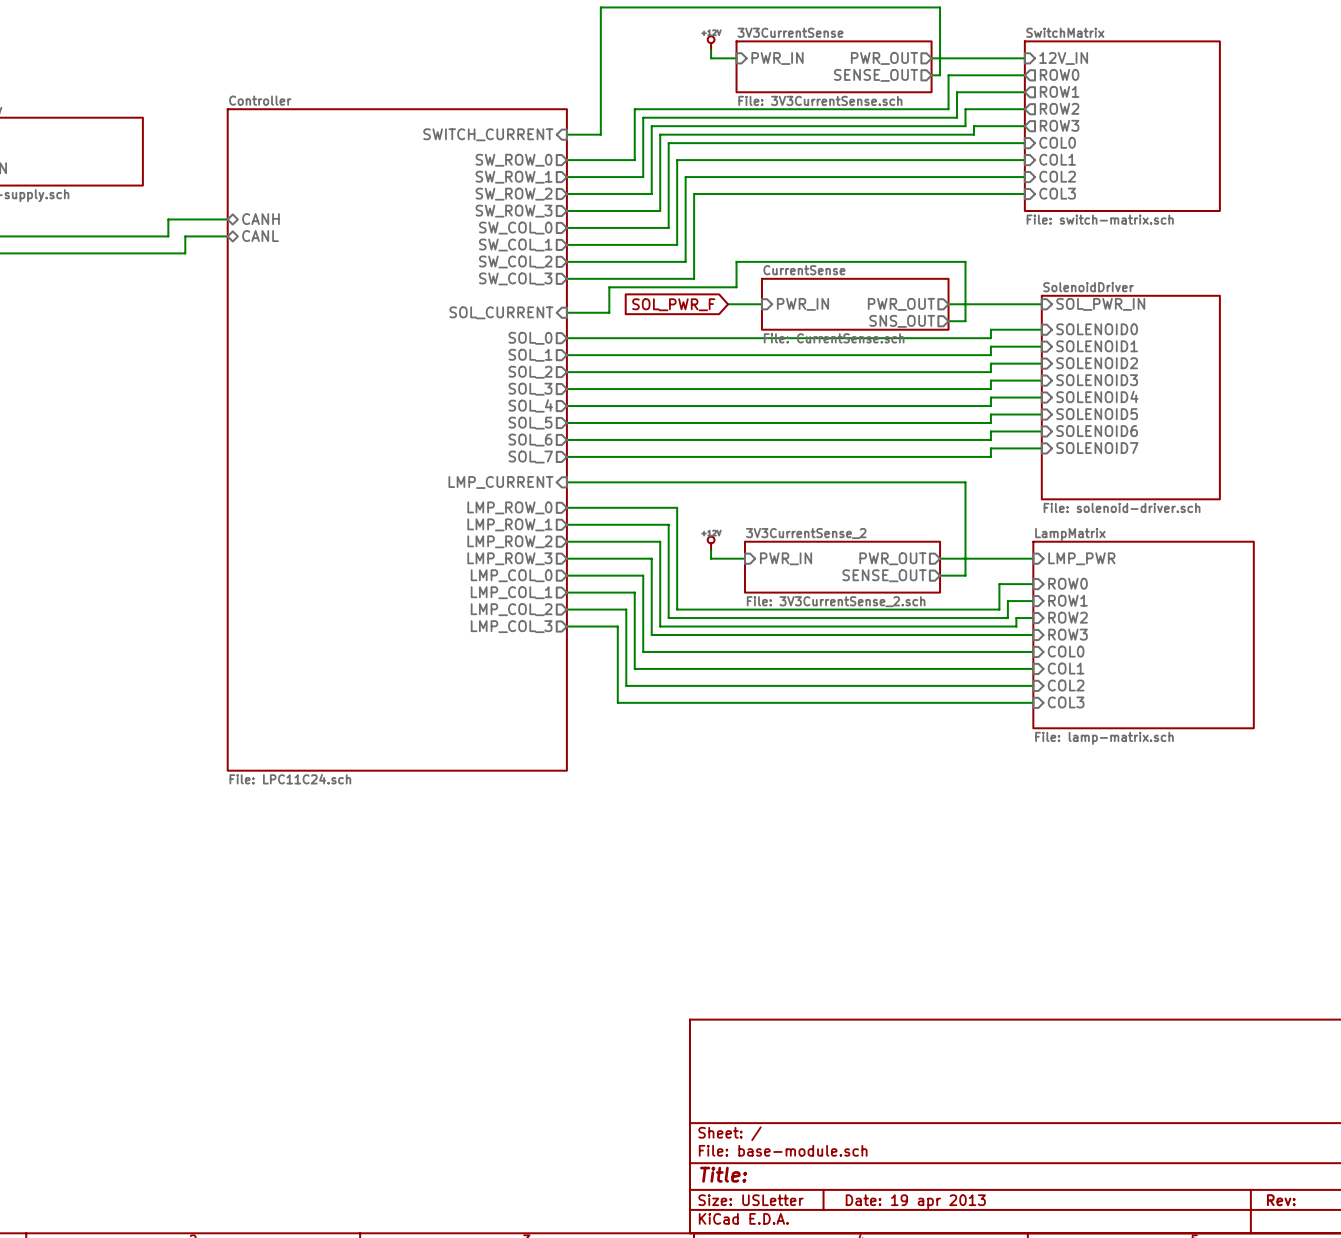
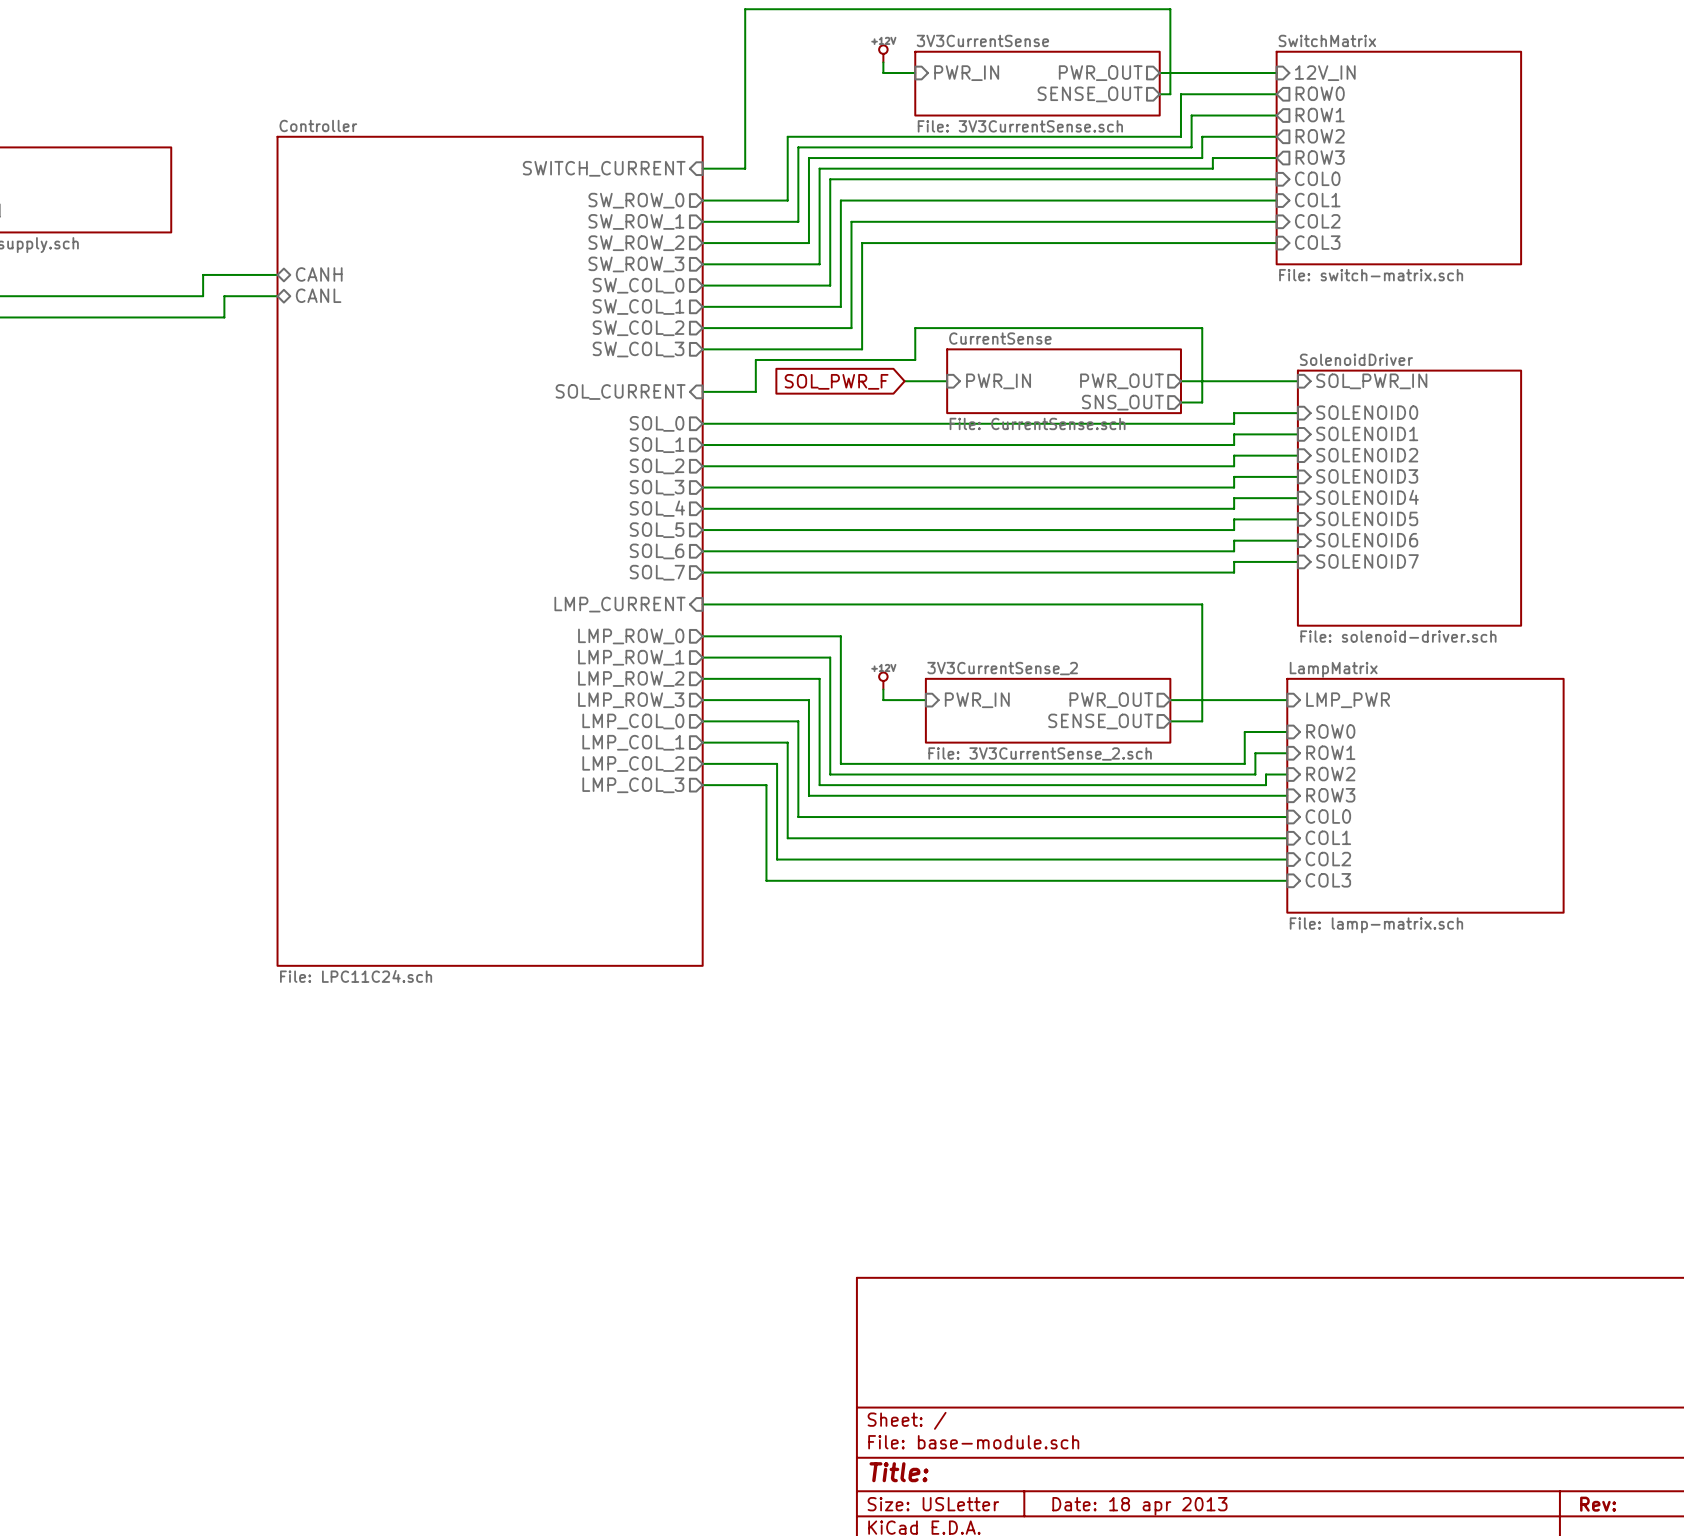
title block: Date: 19 apr 2013 (915, 1201) -> Date: 18 apr 2013 (1139, 1506)

